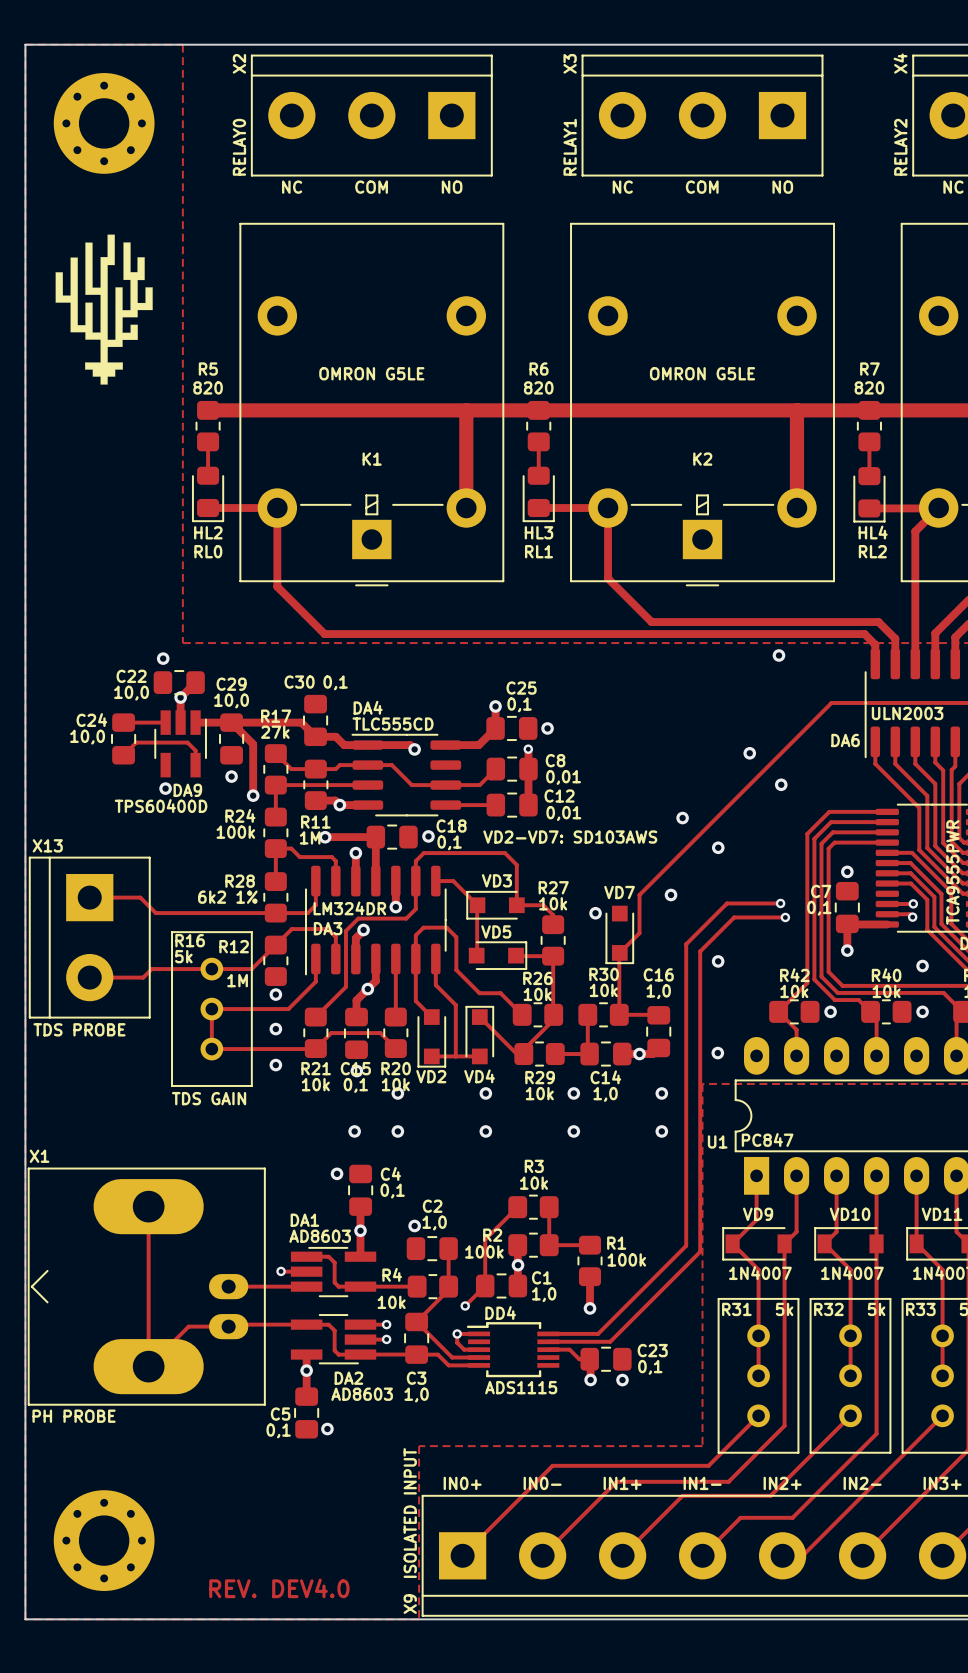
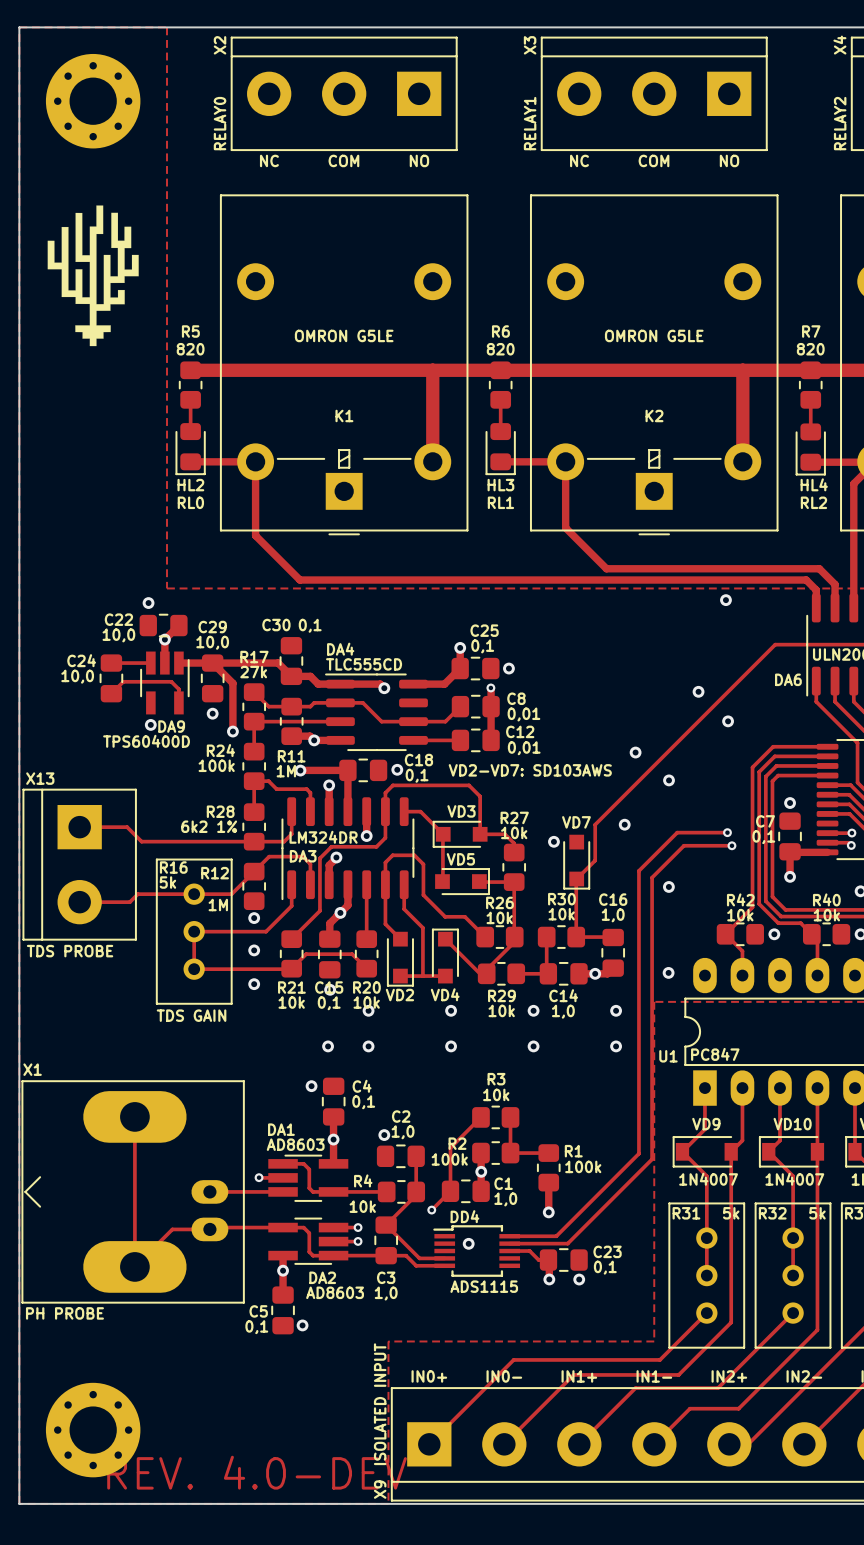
via: (457, 1333) -> none
track: (479, 1333) (457, 1333) (457, 1342) (464, 1349) (479, 1349) -> none
via: none -> (468, 1243)
text: REV. DEV4.0 (279, 1588) -> REV. 4.0-DEV (257, 1472)

